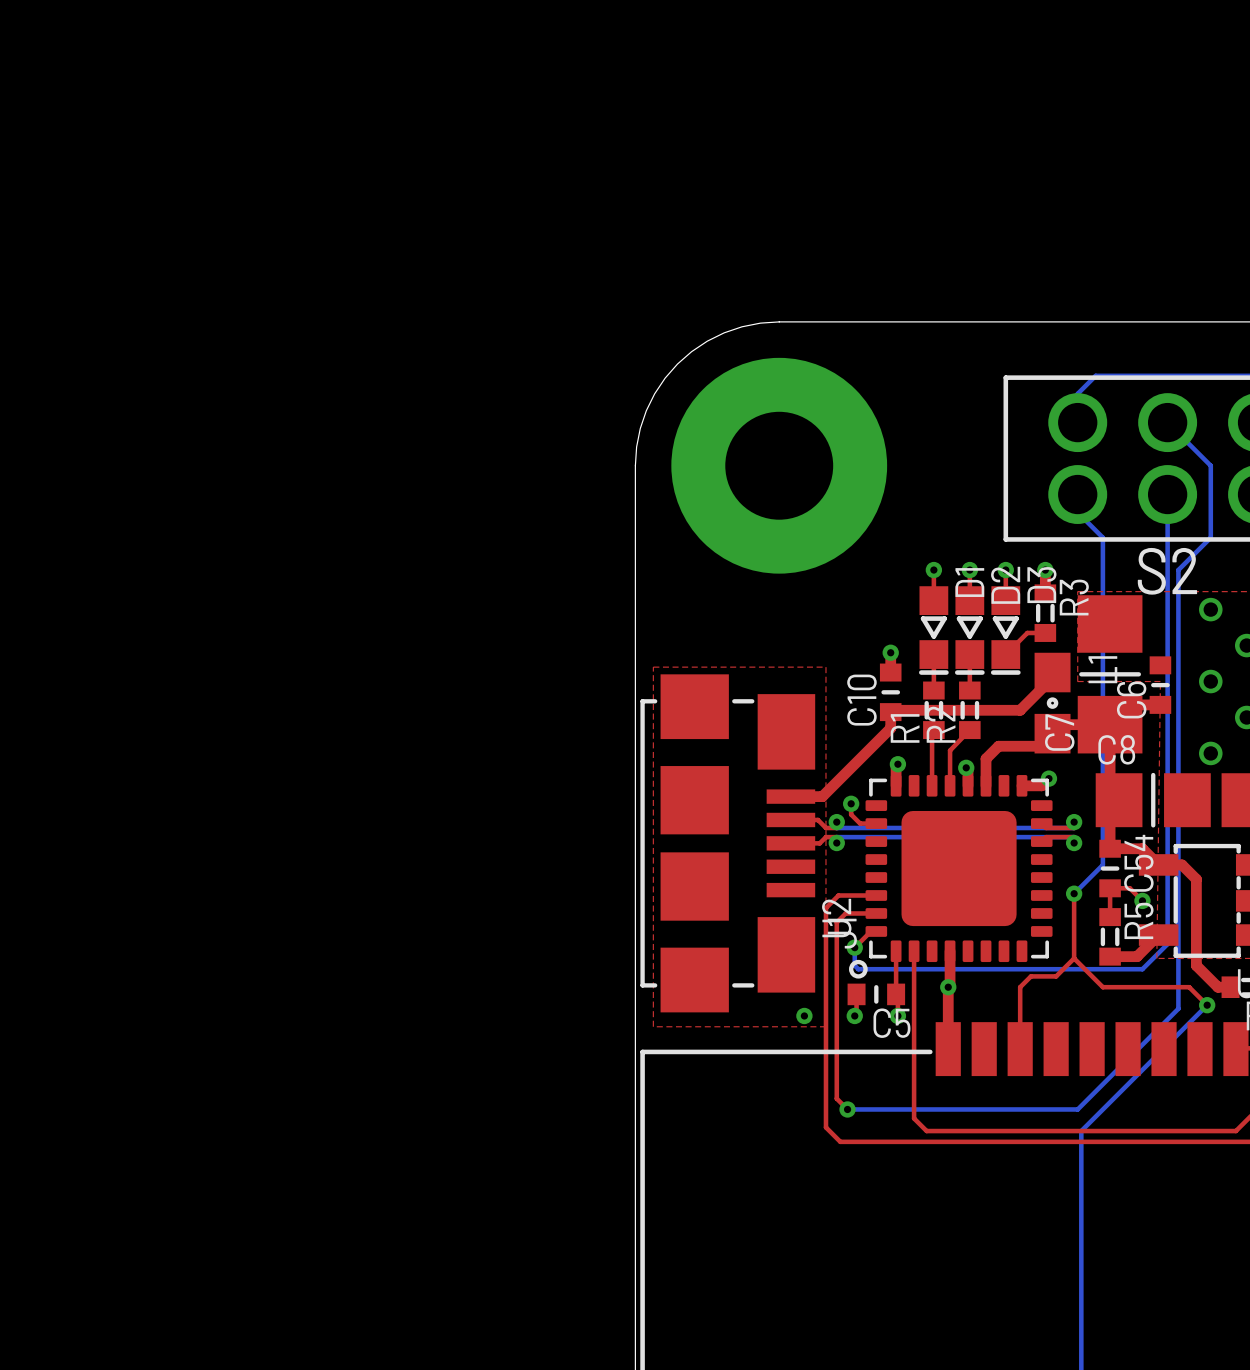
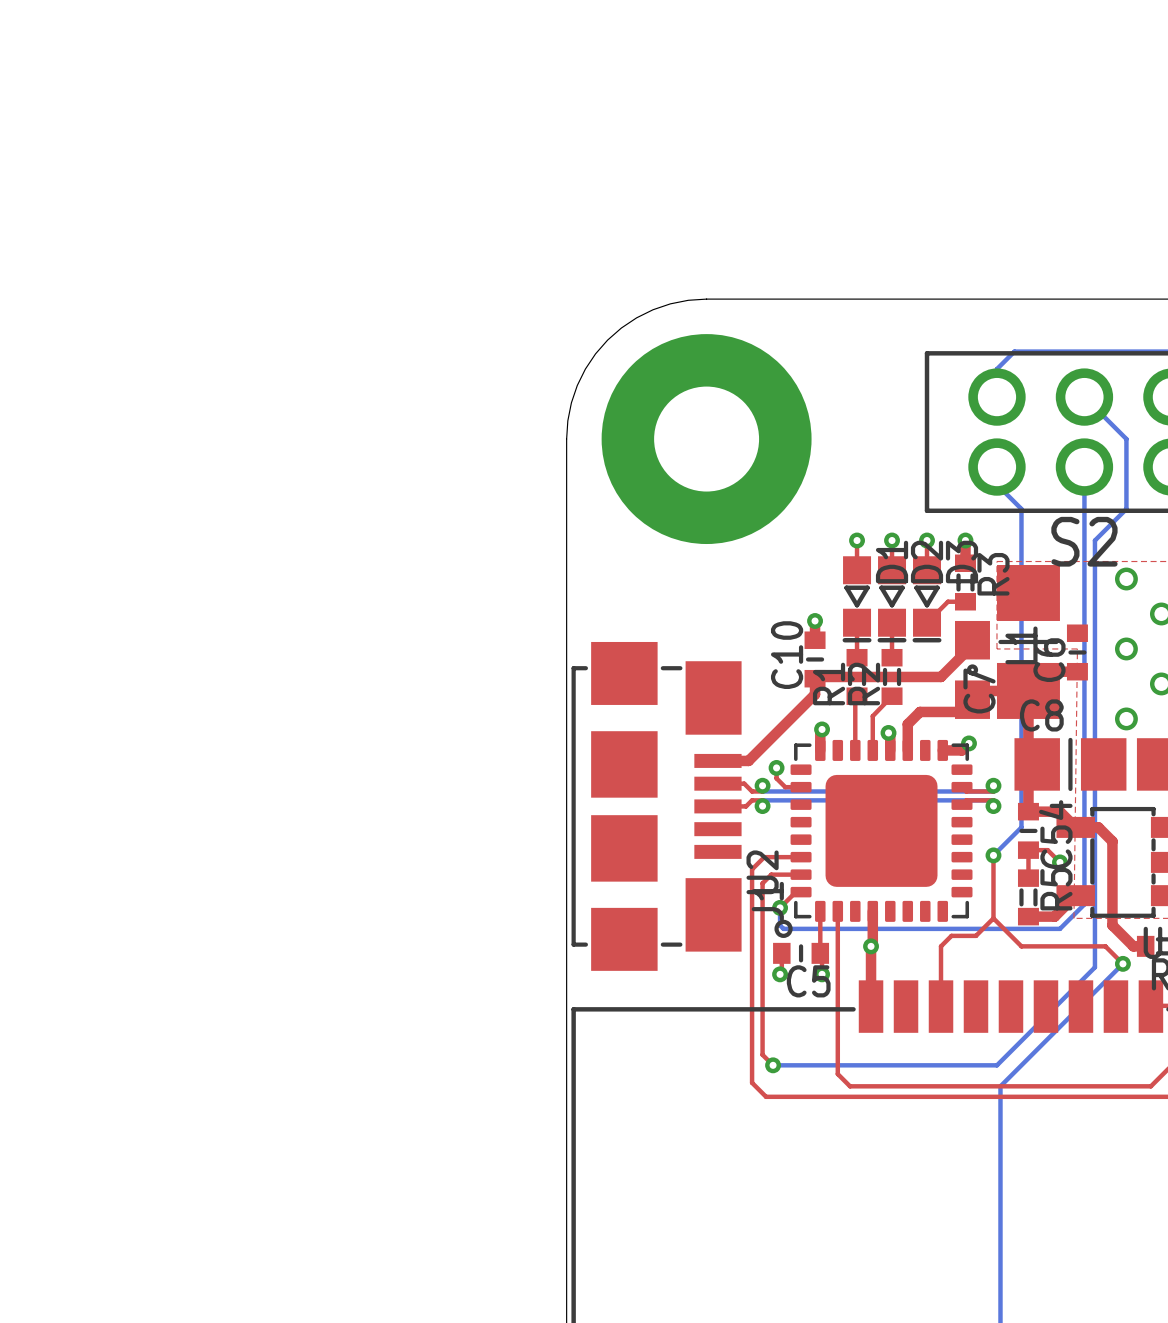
top zone outline: (653, 667) (653, 1026) (825, 1026) (825, 667) (653, 667) -> none
via: (804, 1015) -> none

